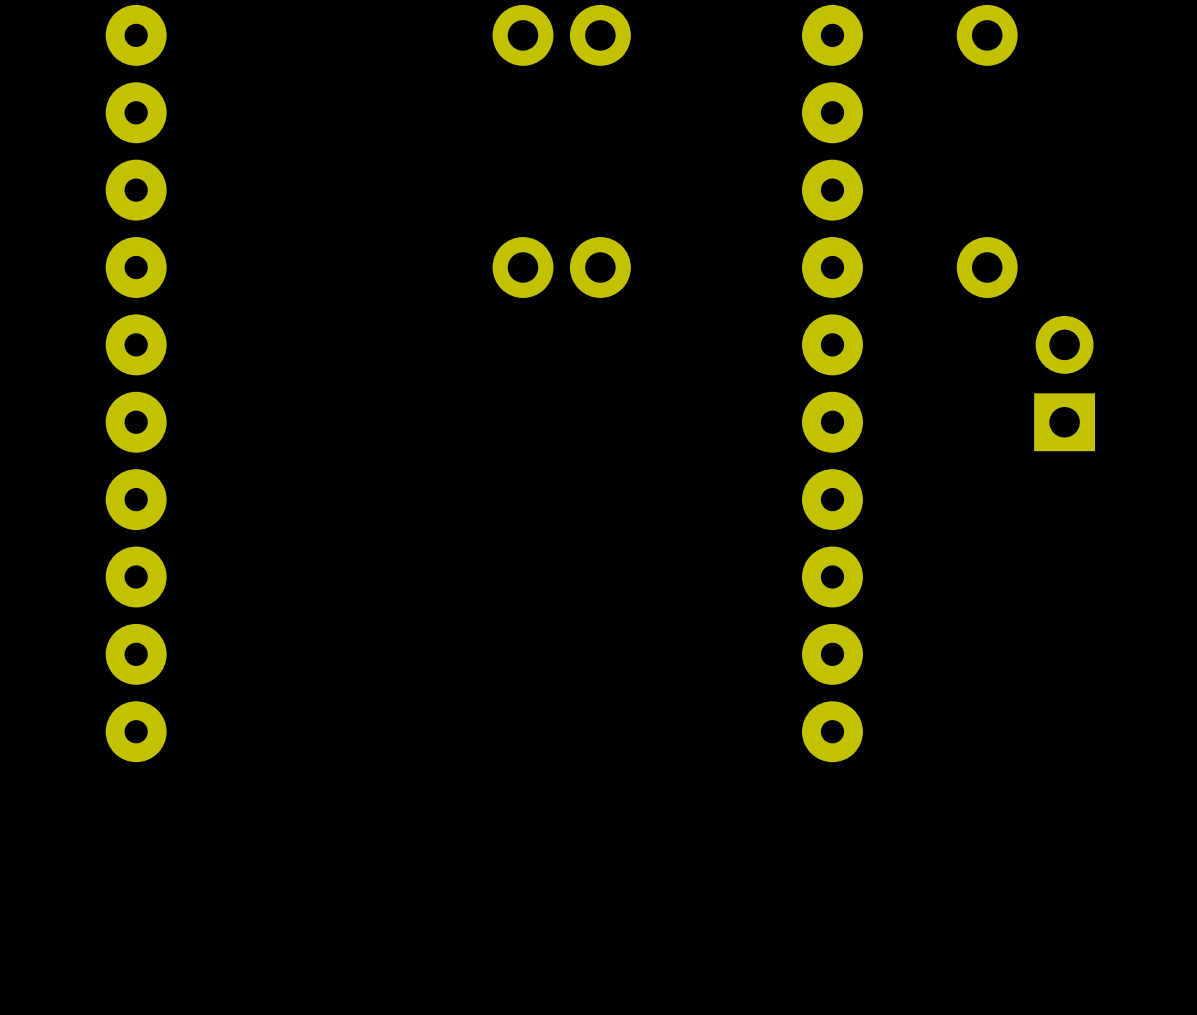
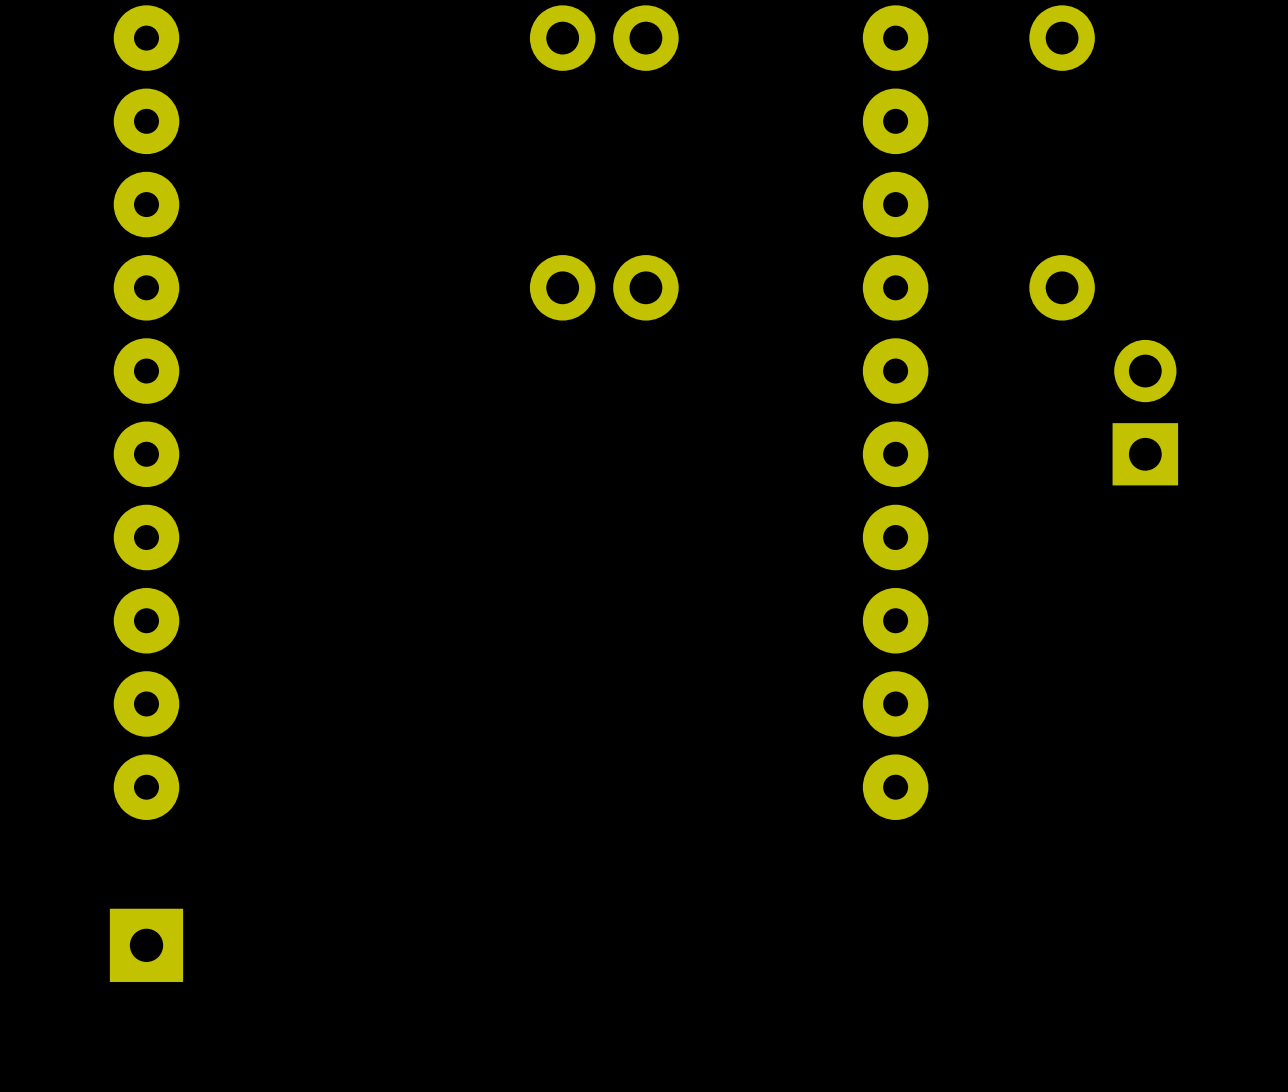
part: none -> (146, 945)

